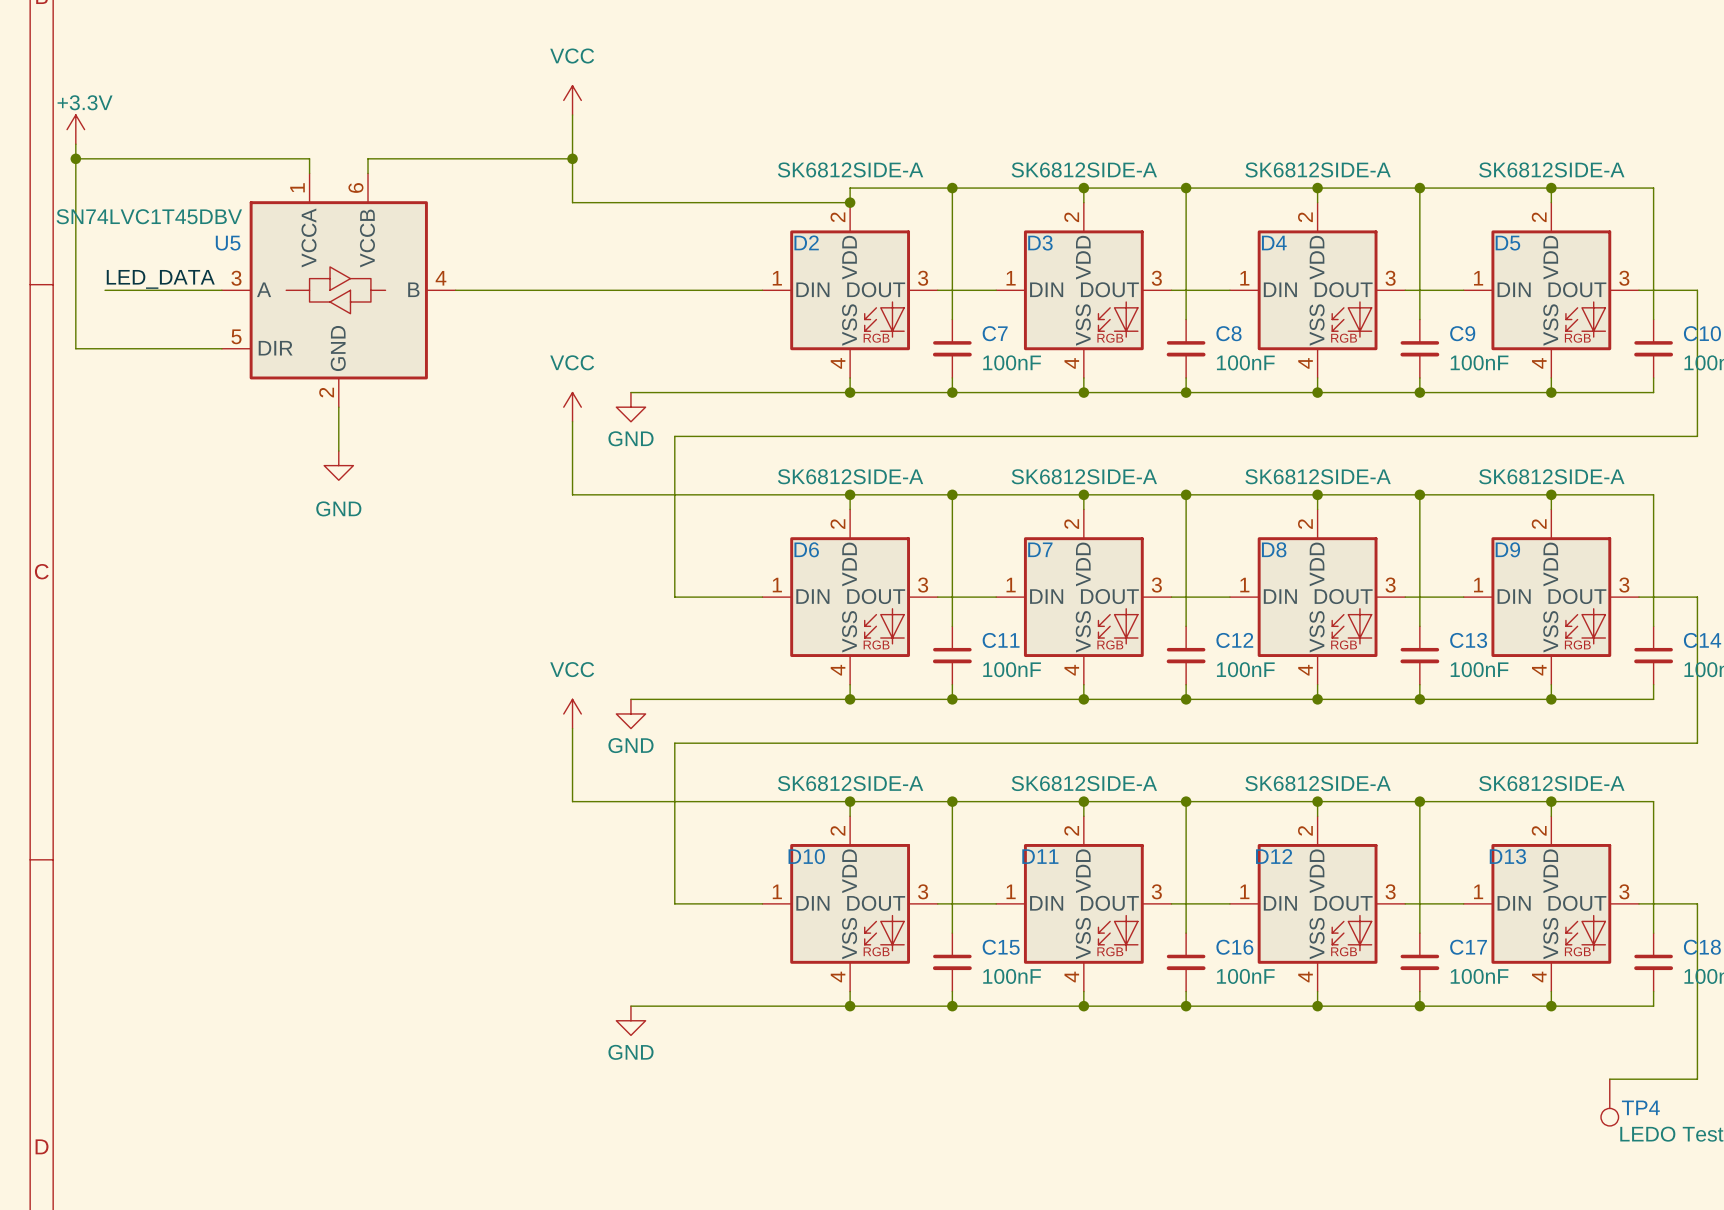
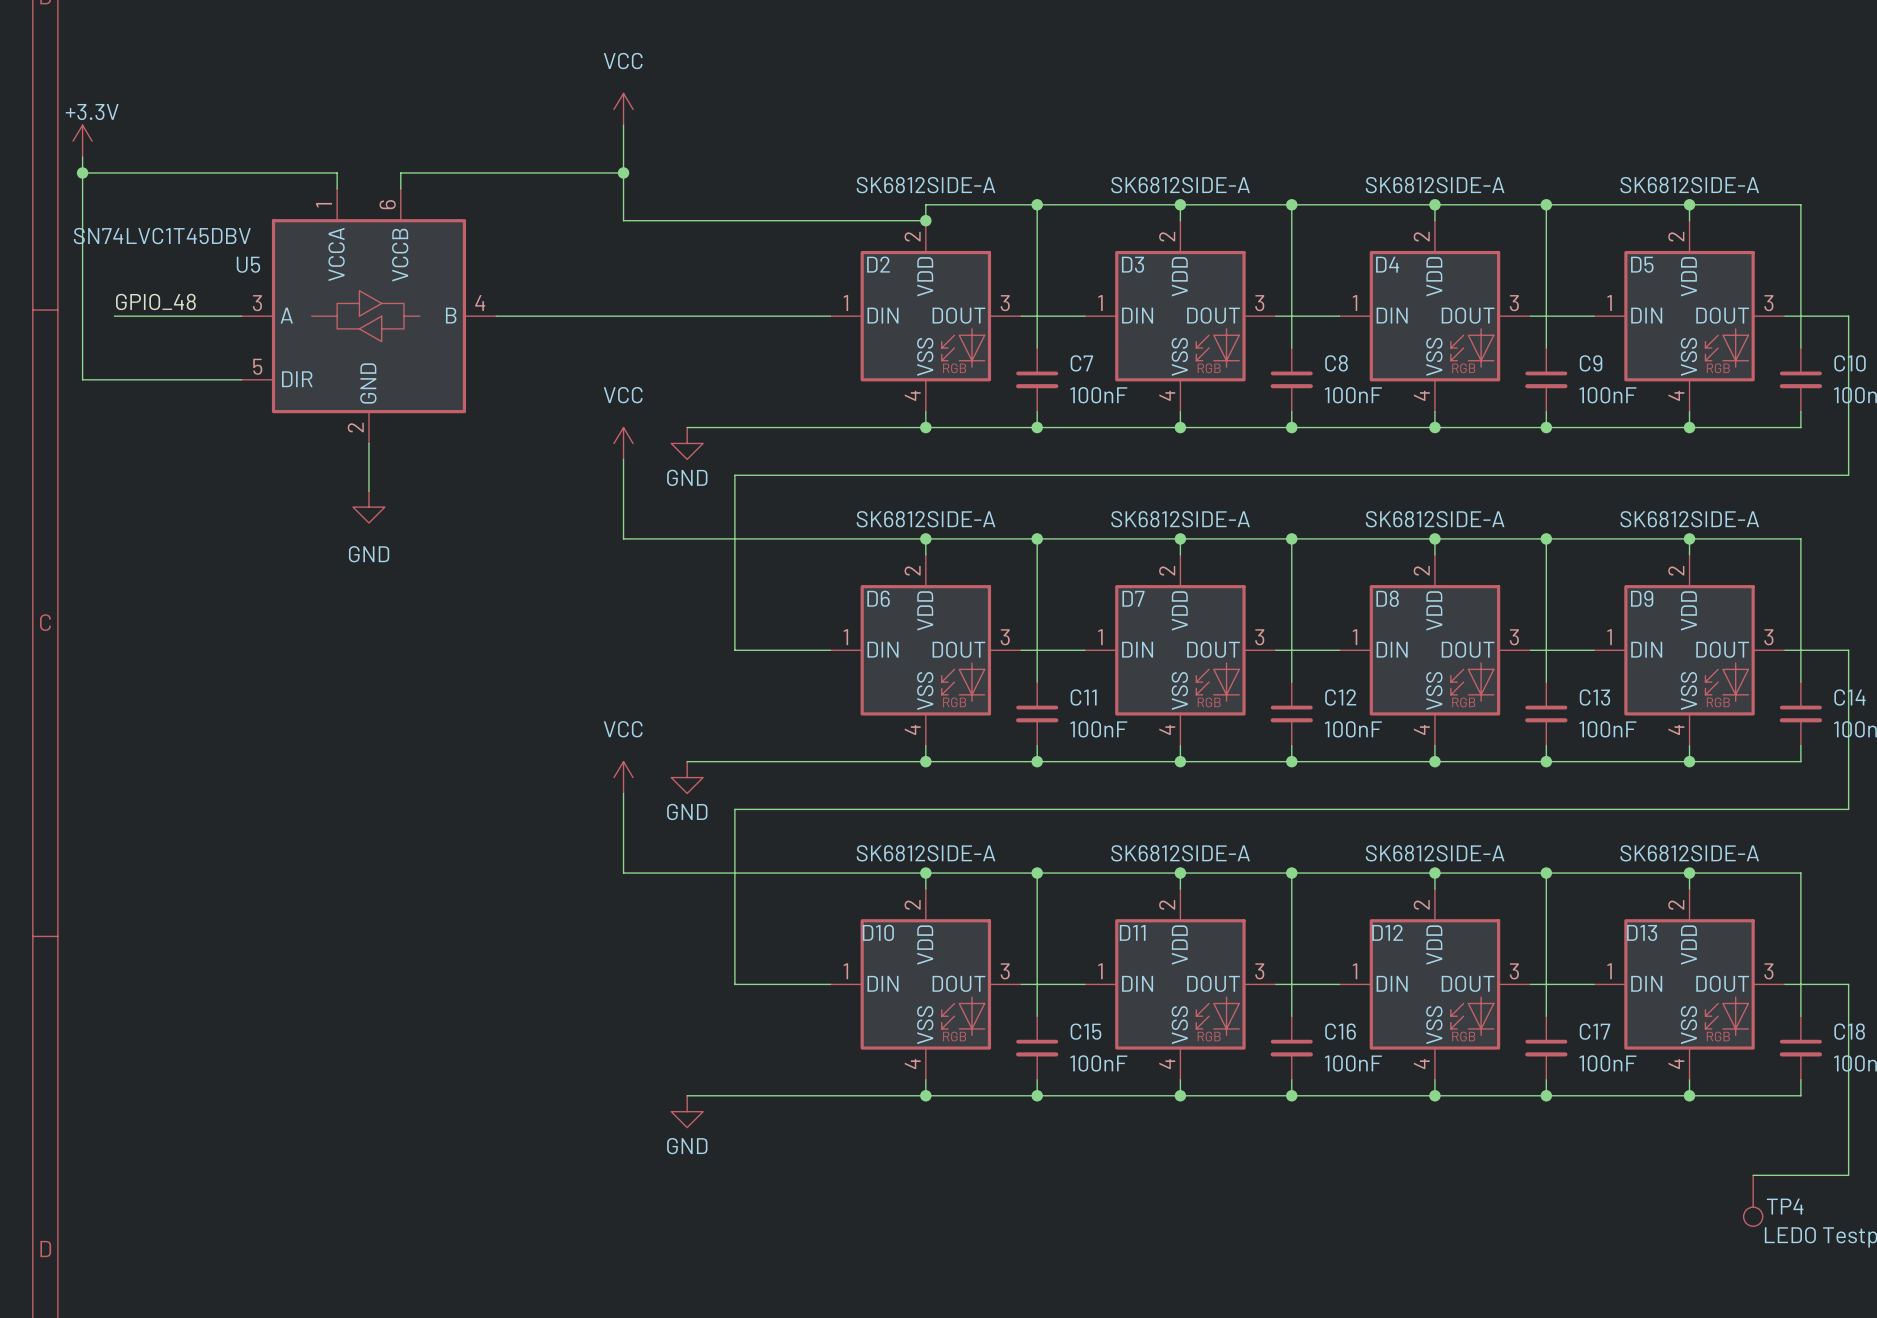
label: LED_DATA (160, 279) -> GPIO_48 (155, 301)

